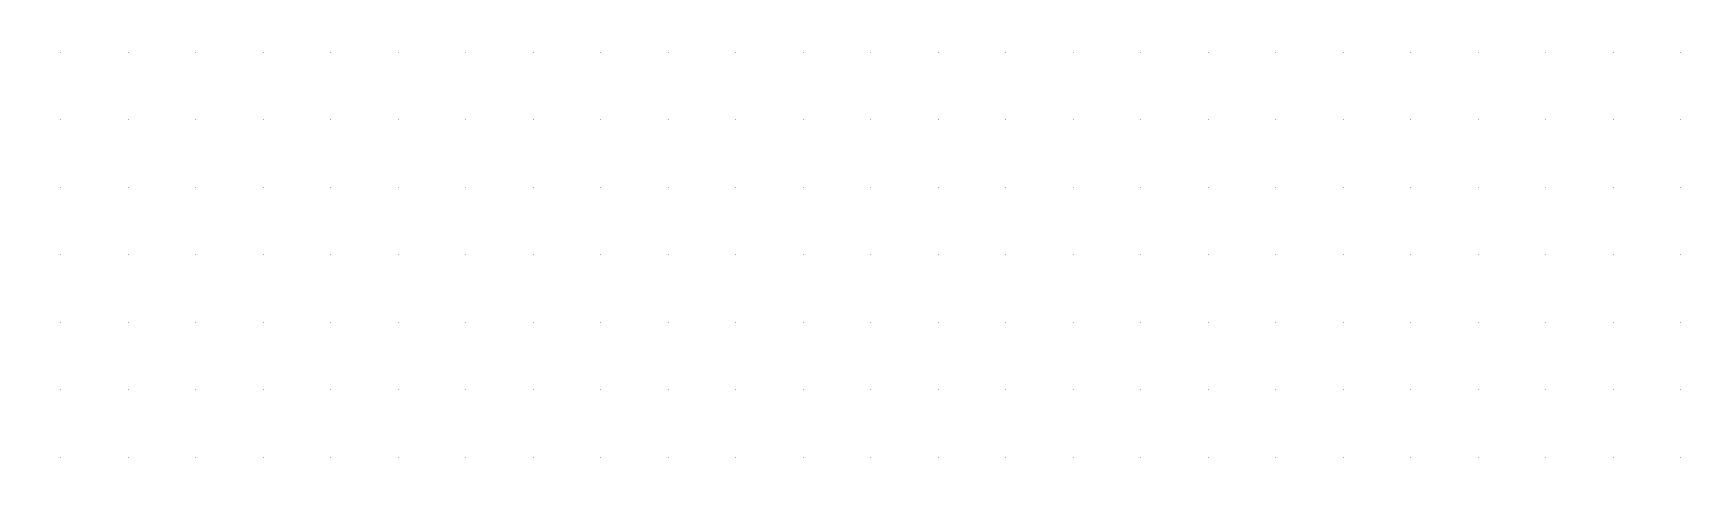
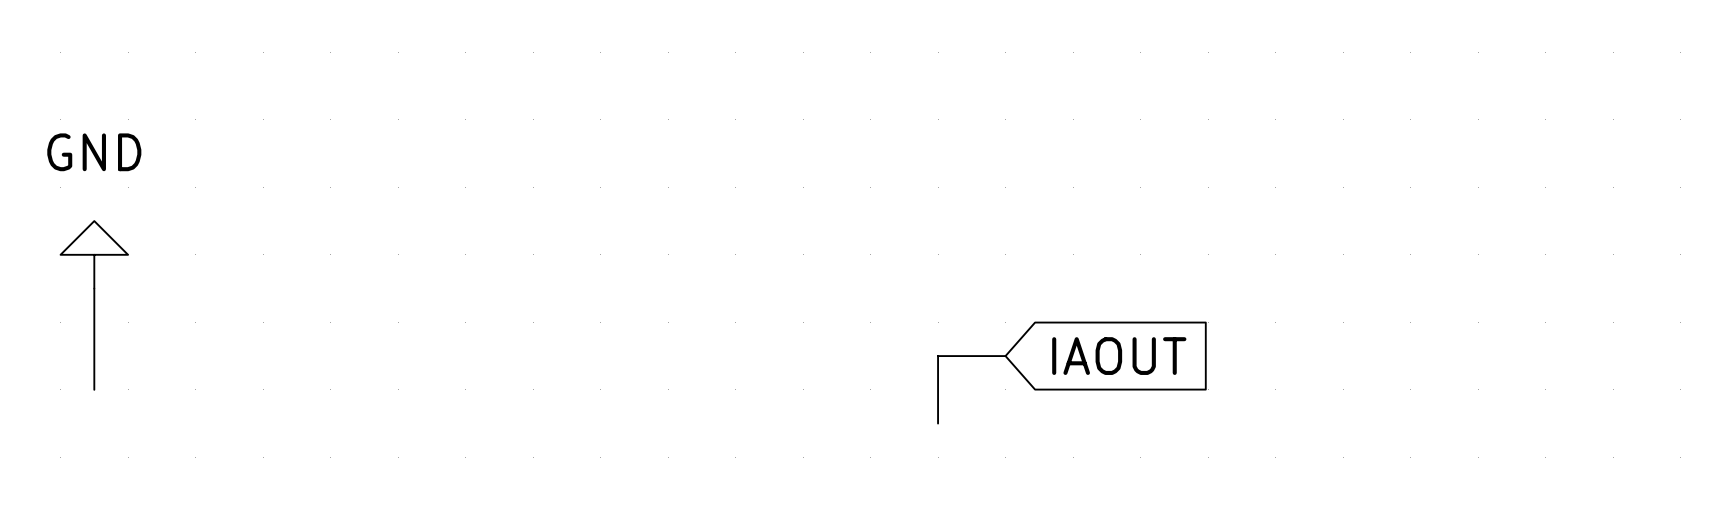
power symbol: none -> GND (94, 254)
wire: none -> (94, 288) (94, 389)
wire: none -> (1005, 356) (938, 356) (938, 423)
global label: none -> IAOUT (1119, 356)

